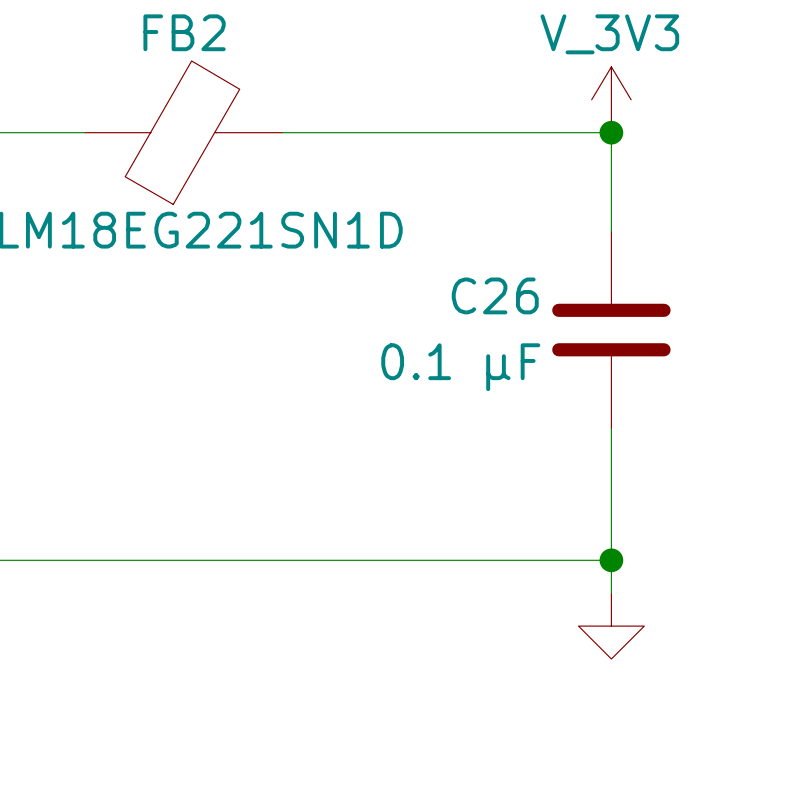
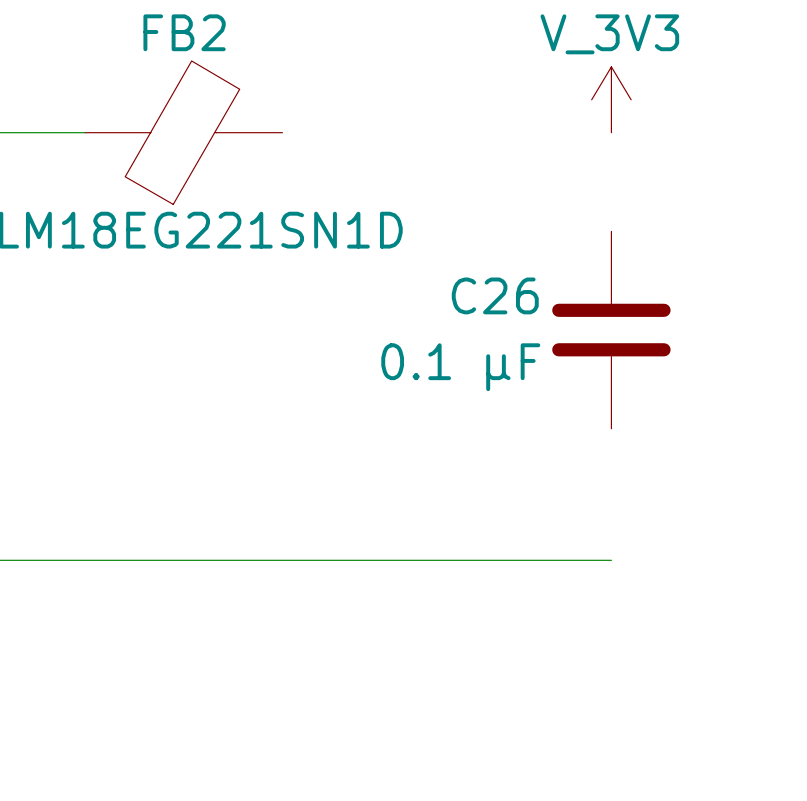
wire: (282, 132) (611, 132) (611, 231) -> none
junction: (611, 132) -> none
wire: (611, 428) (611, 593) -> none
junction: (611, 560) -> none
power symbol: (611, 626) -> none

